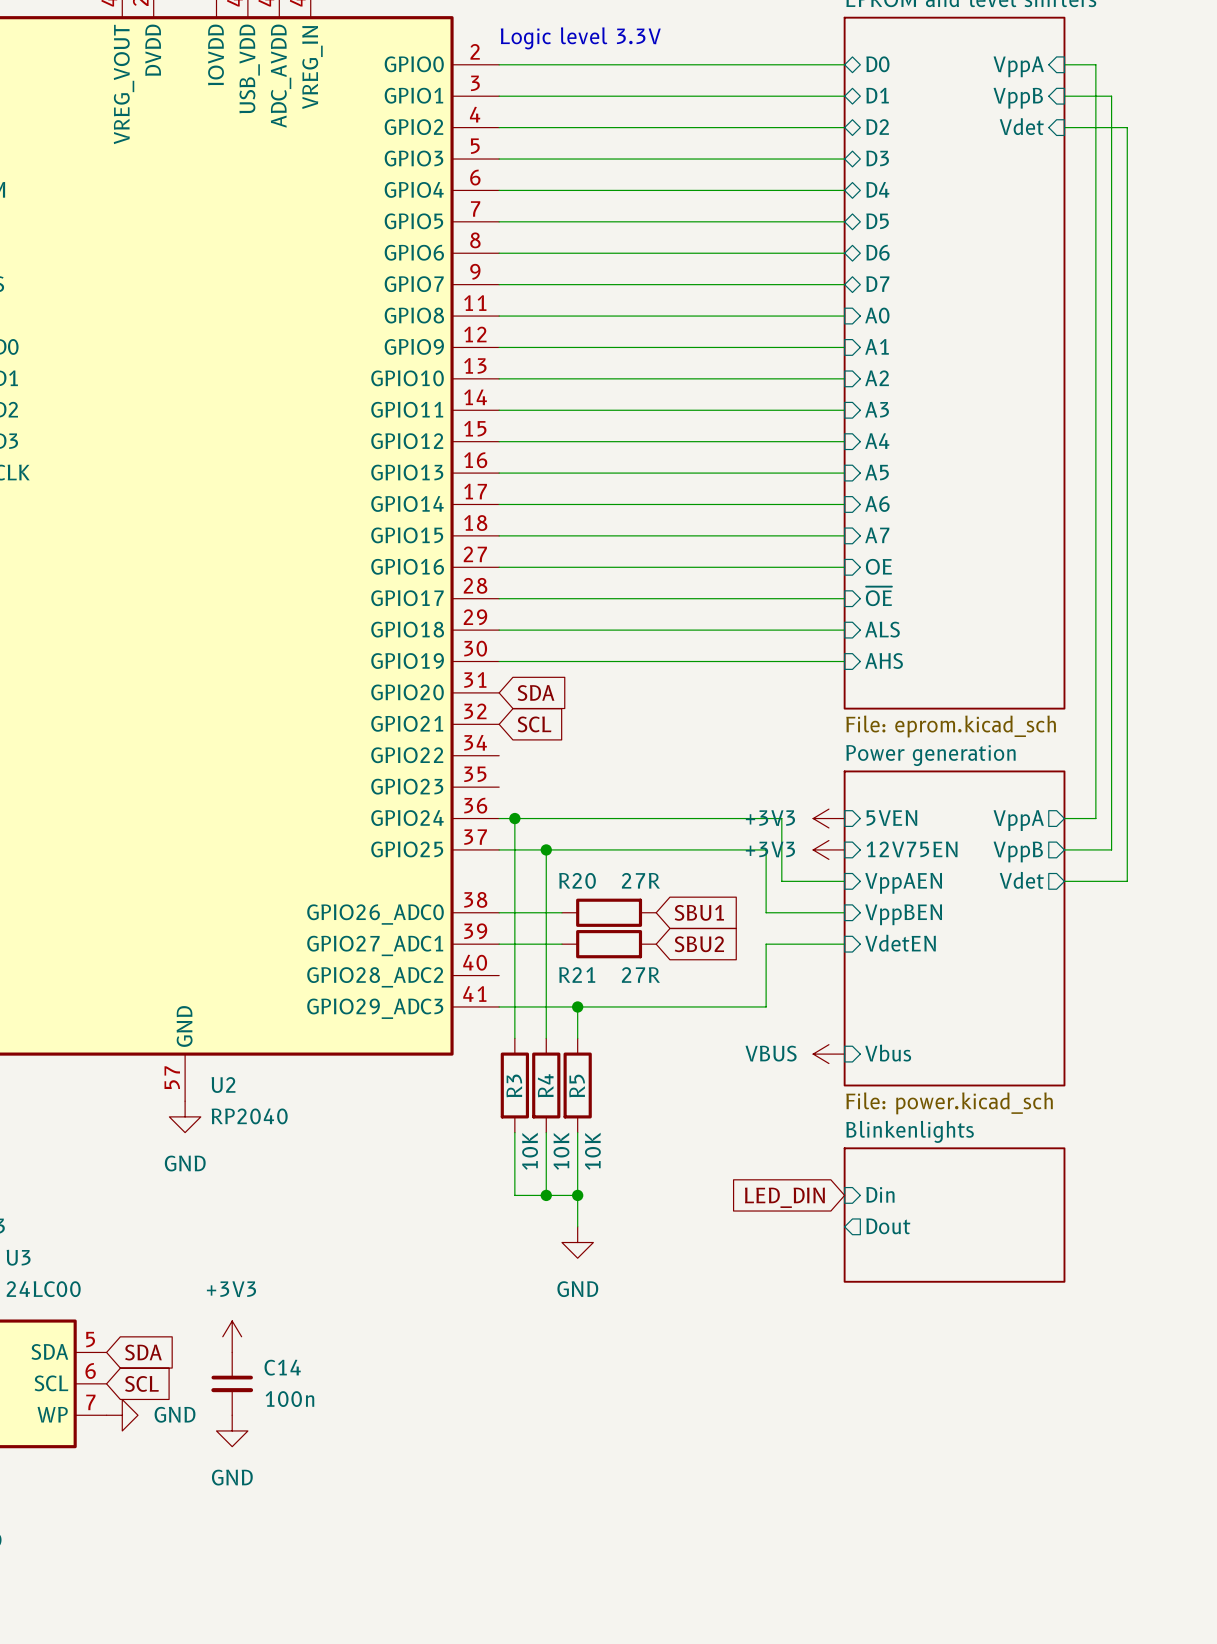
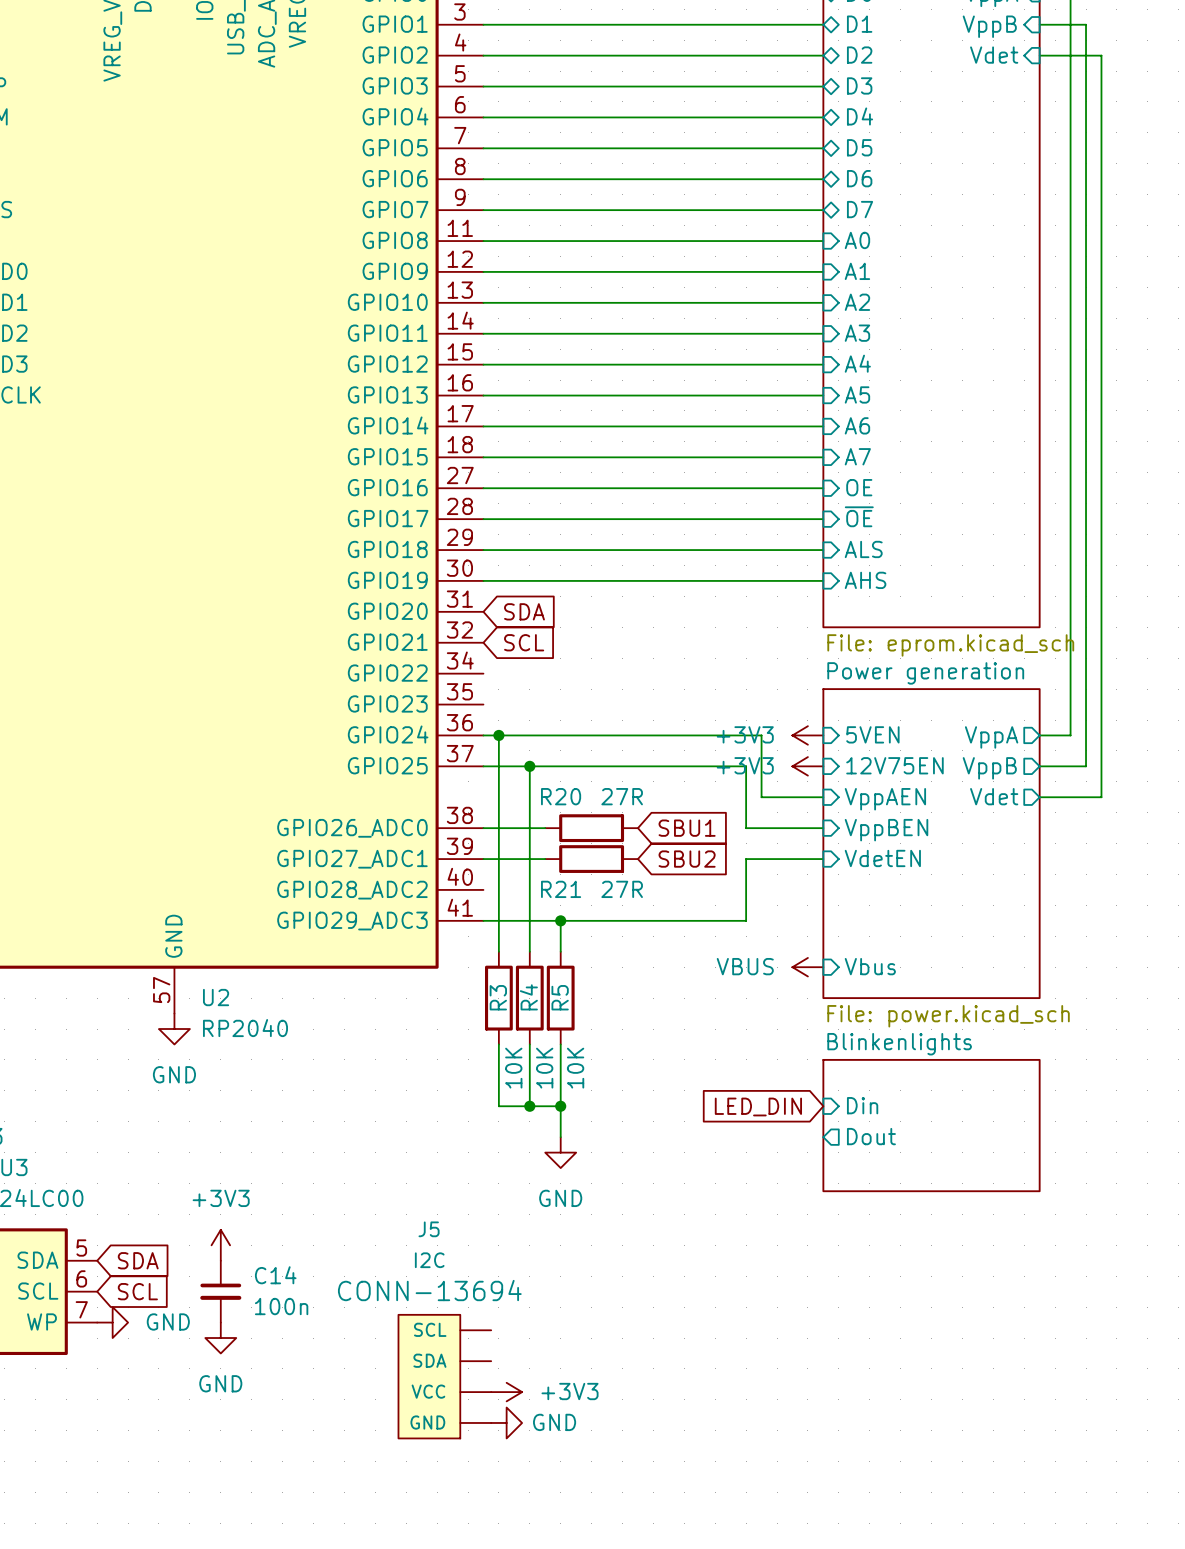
J5: none -> I2C (444, 1376)
power symbol: none -> +3V3 (506, 1392)
power symbol: none -> GND (506, 1422)

